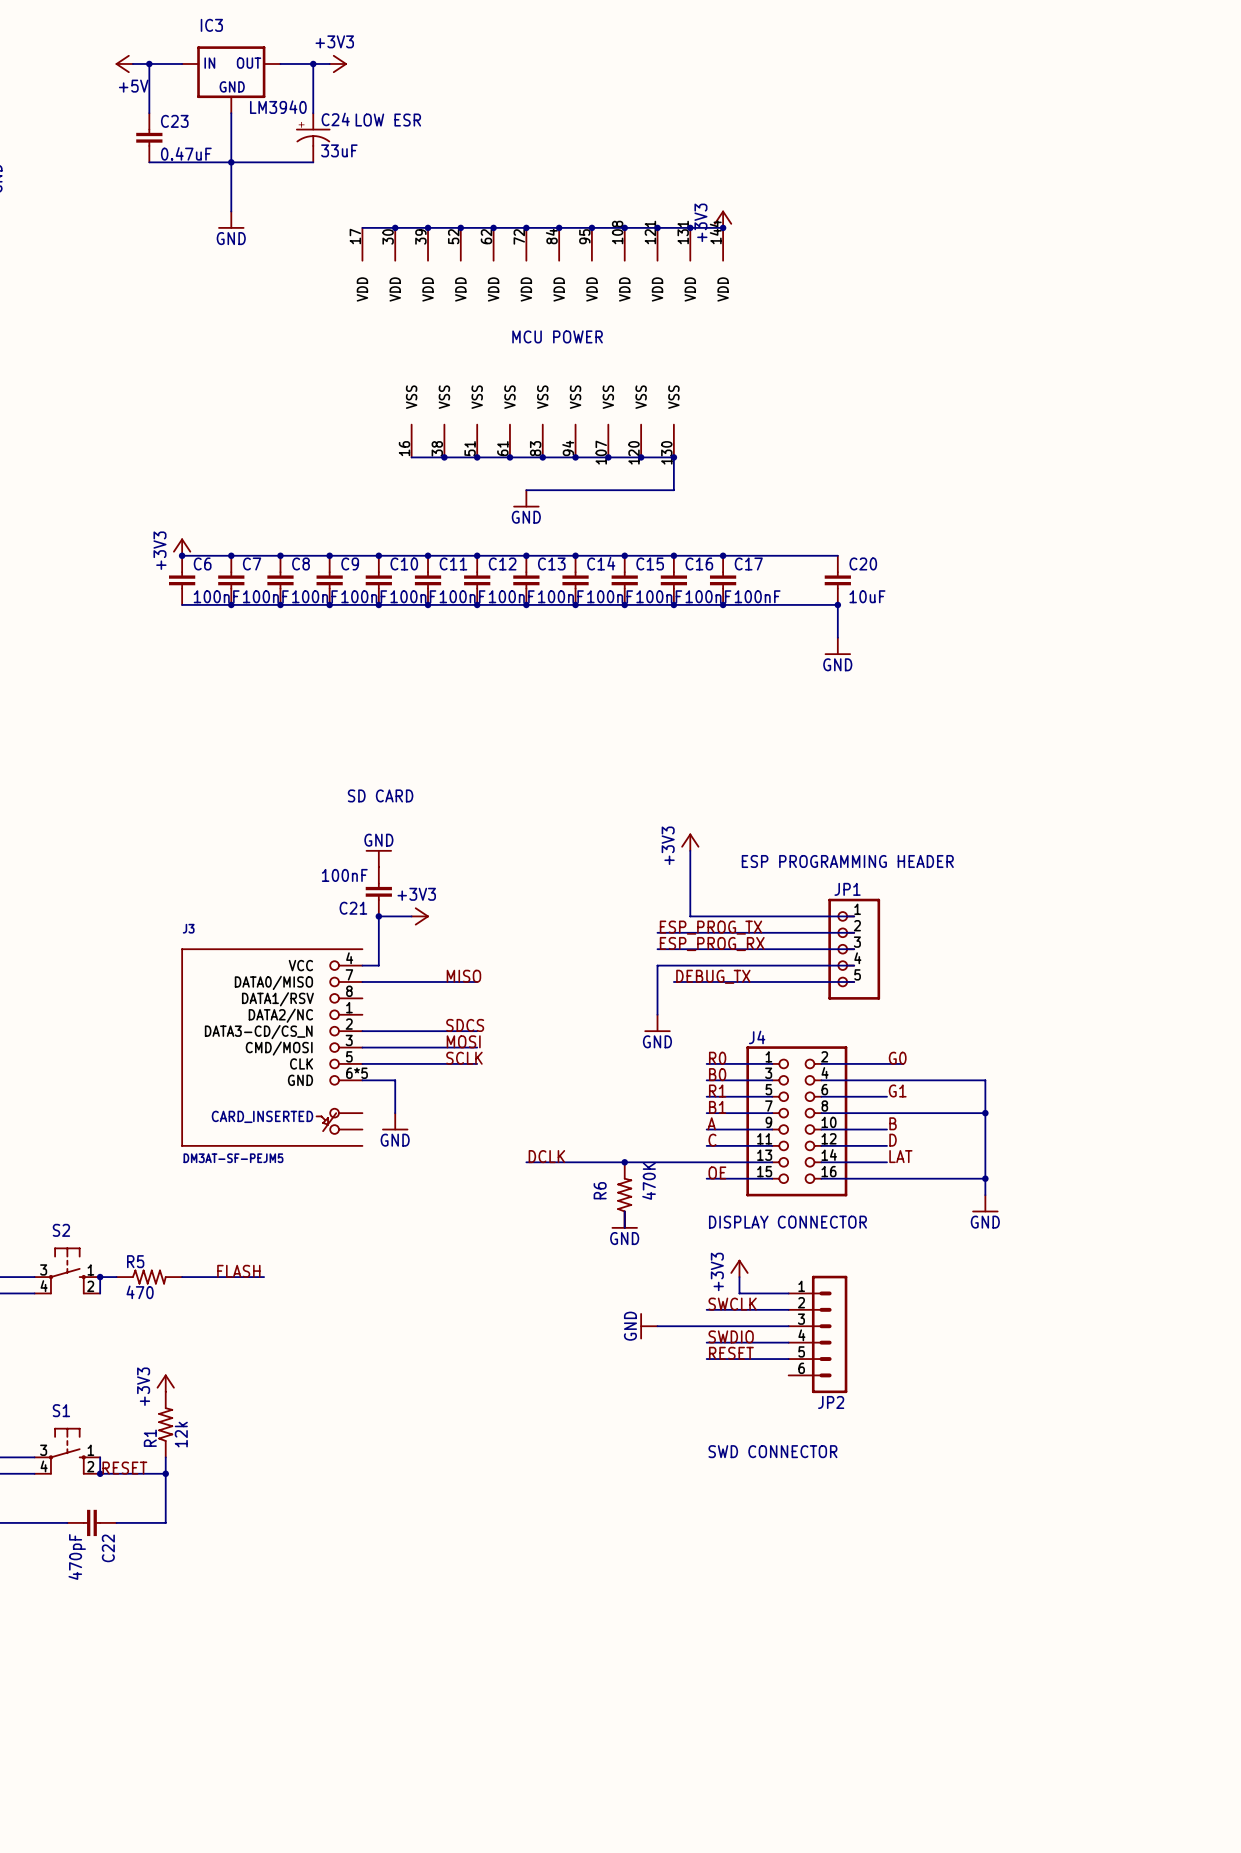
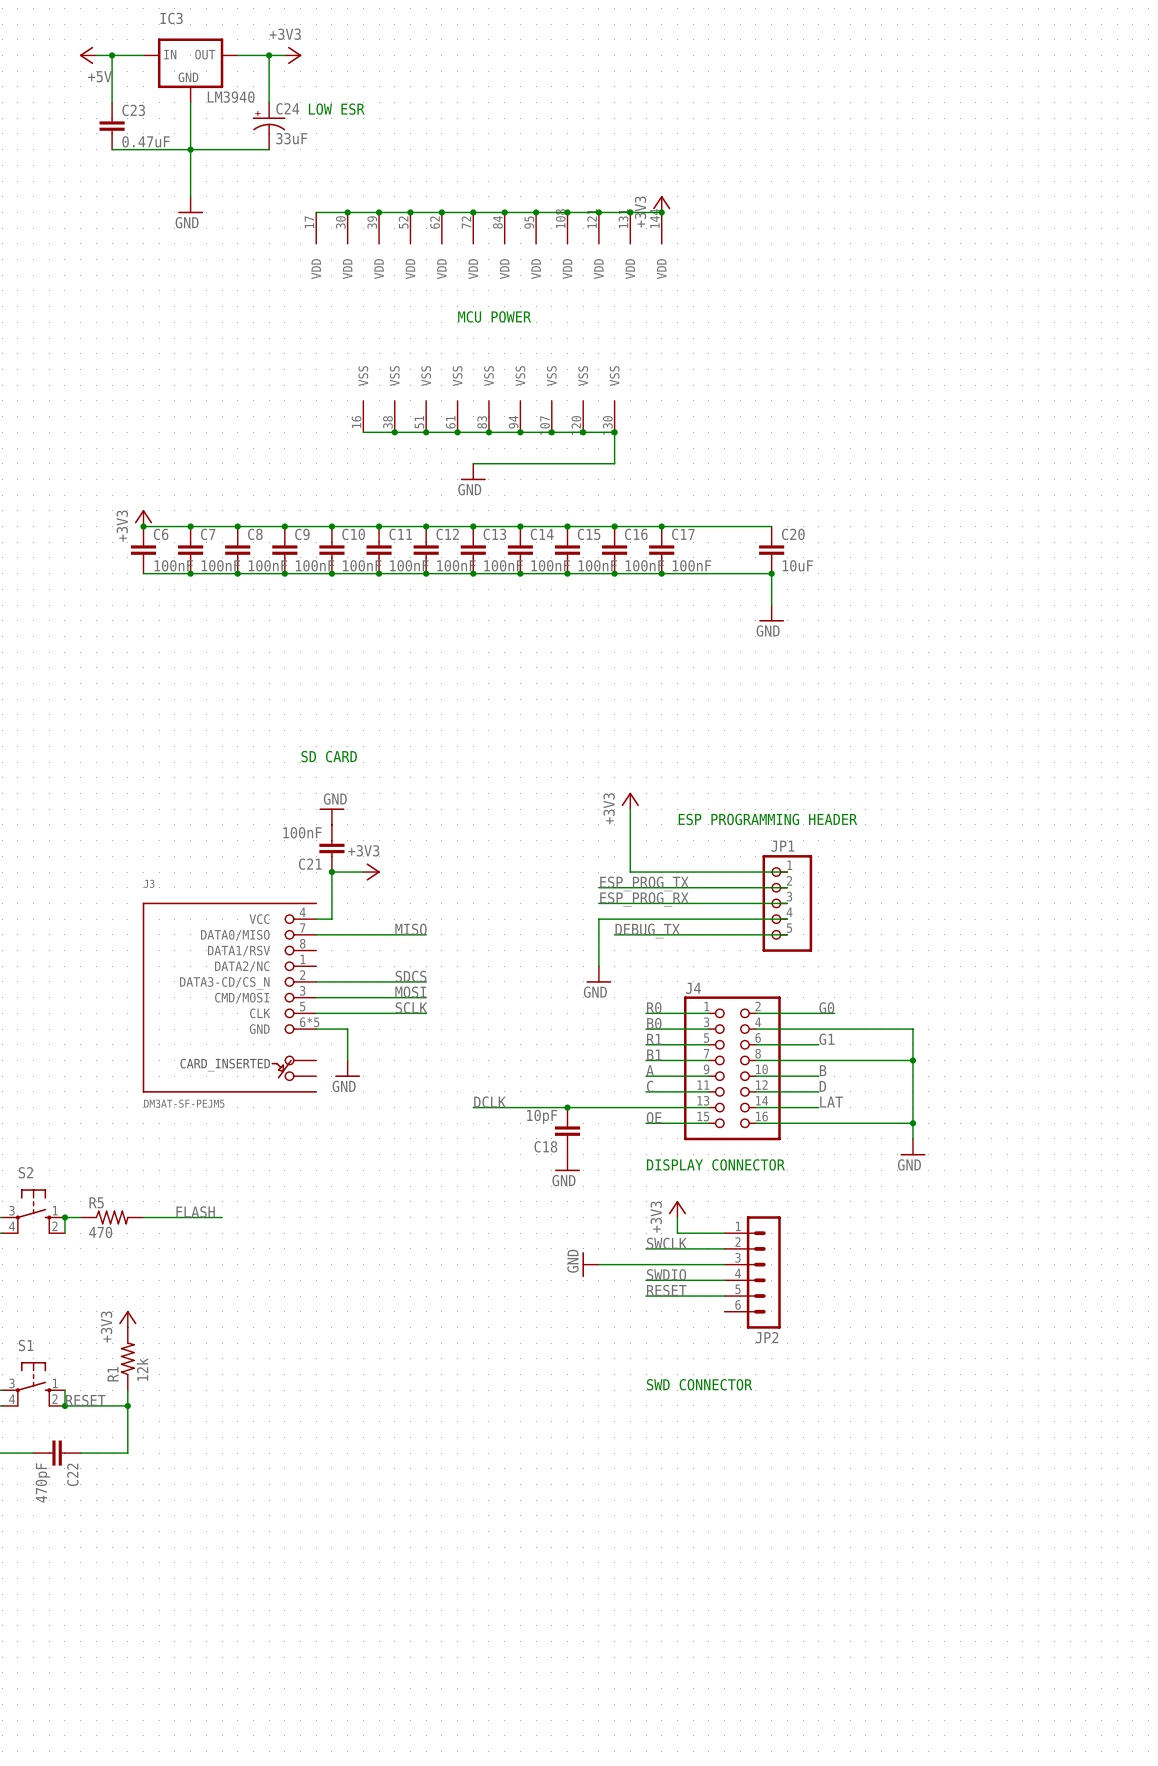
C18: none -> 10pF (567, 1131)
R6: 470K (624, 1195) -> none

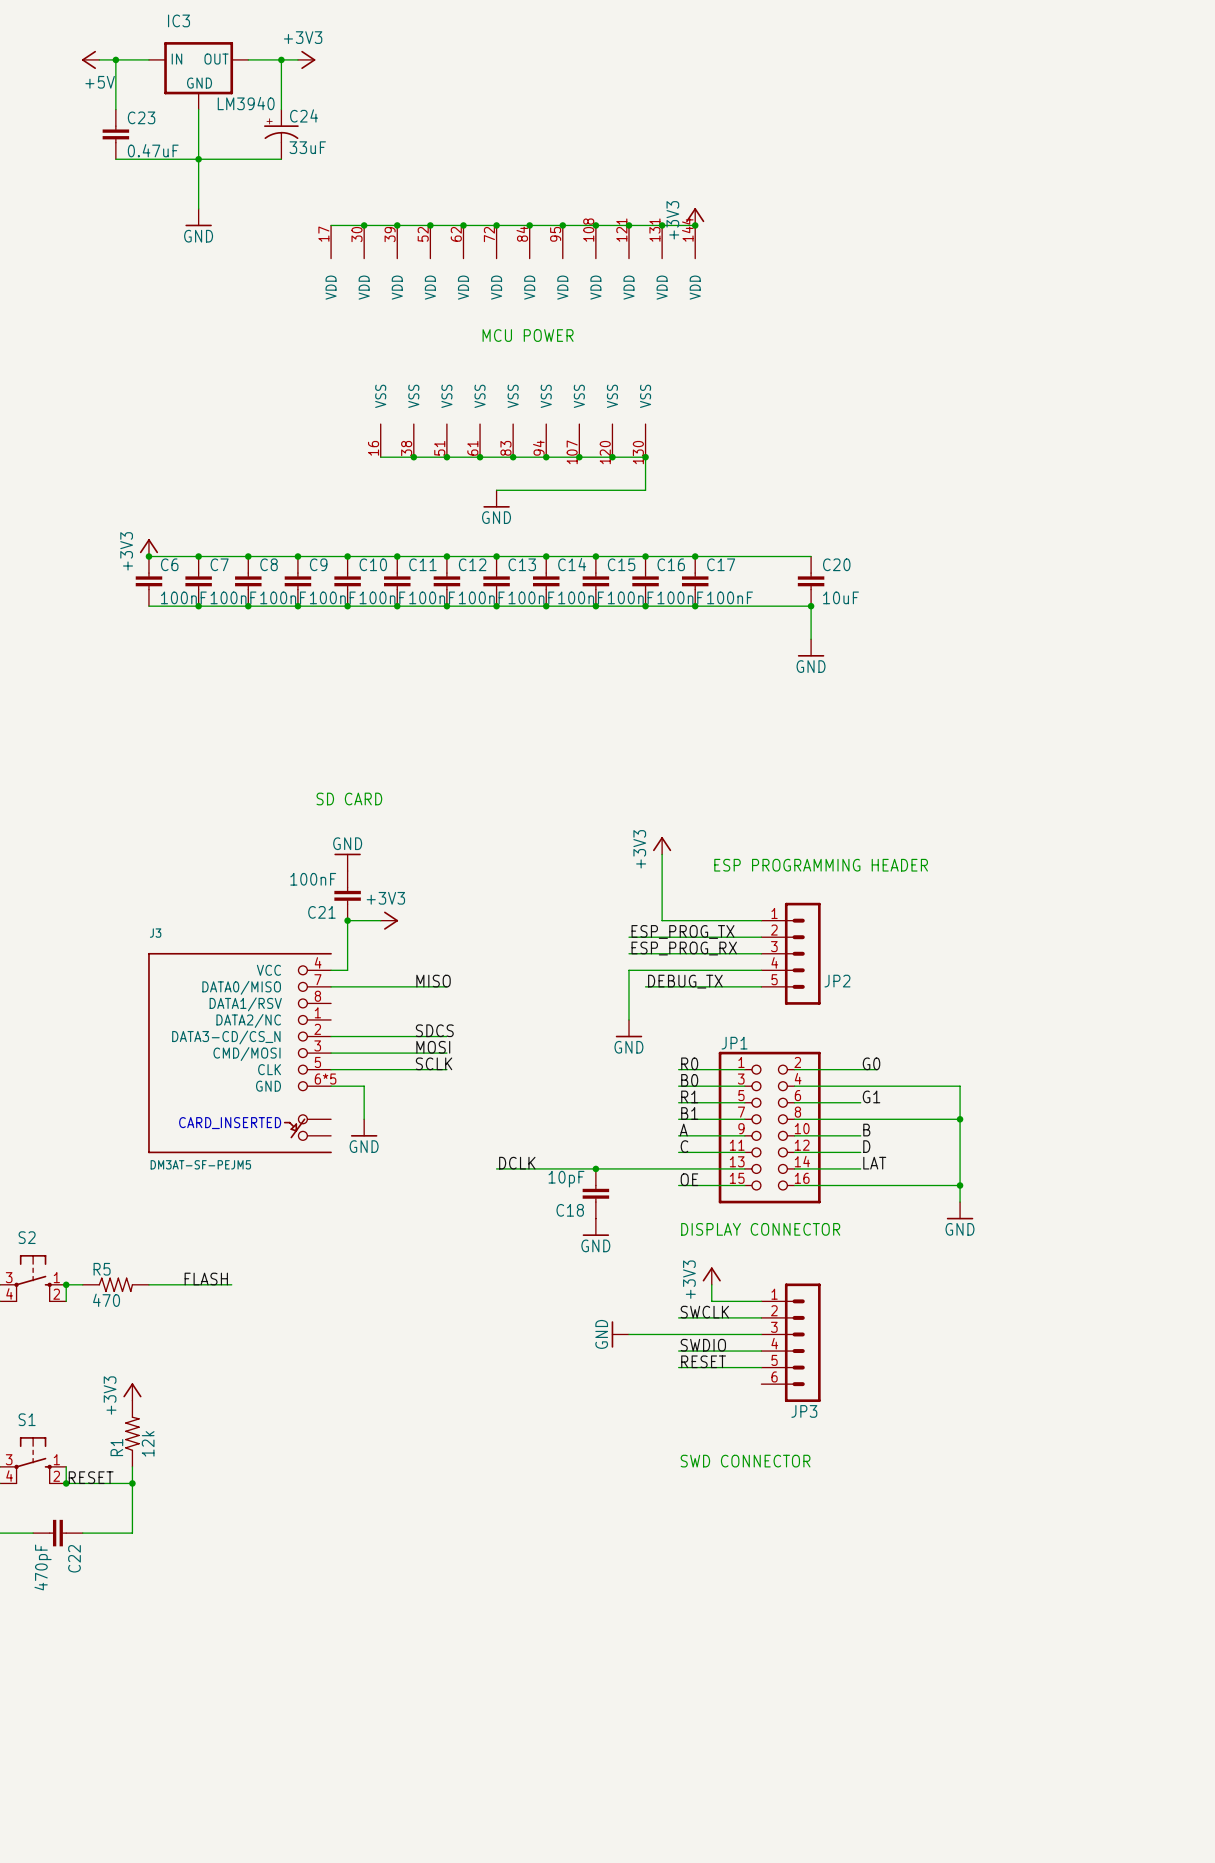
text: LOW ESR (336, 109) -> none
JP2: none -> (791, 953)
JP1: (787, 903) -> none
J4 name: J4 (693, 988) -> JP1 (734, 1043)
JP2 name: JP2 (767, 1337) -> JP3 (804, 1411)

